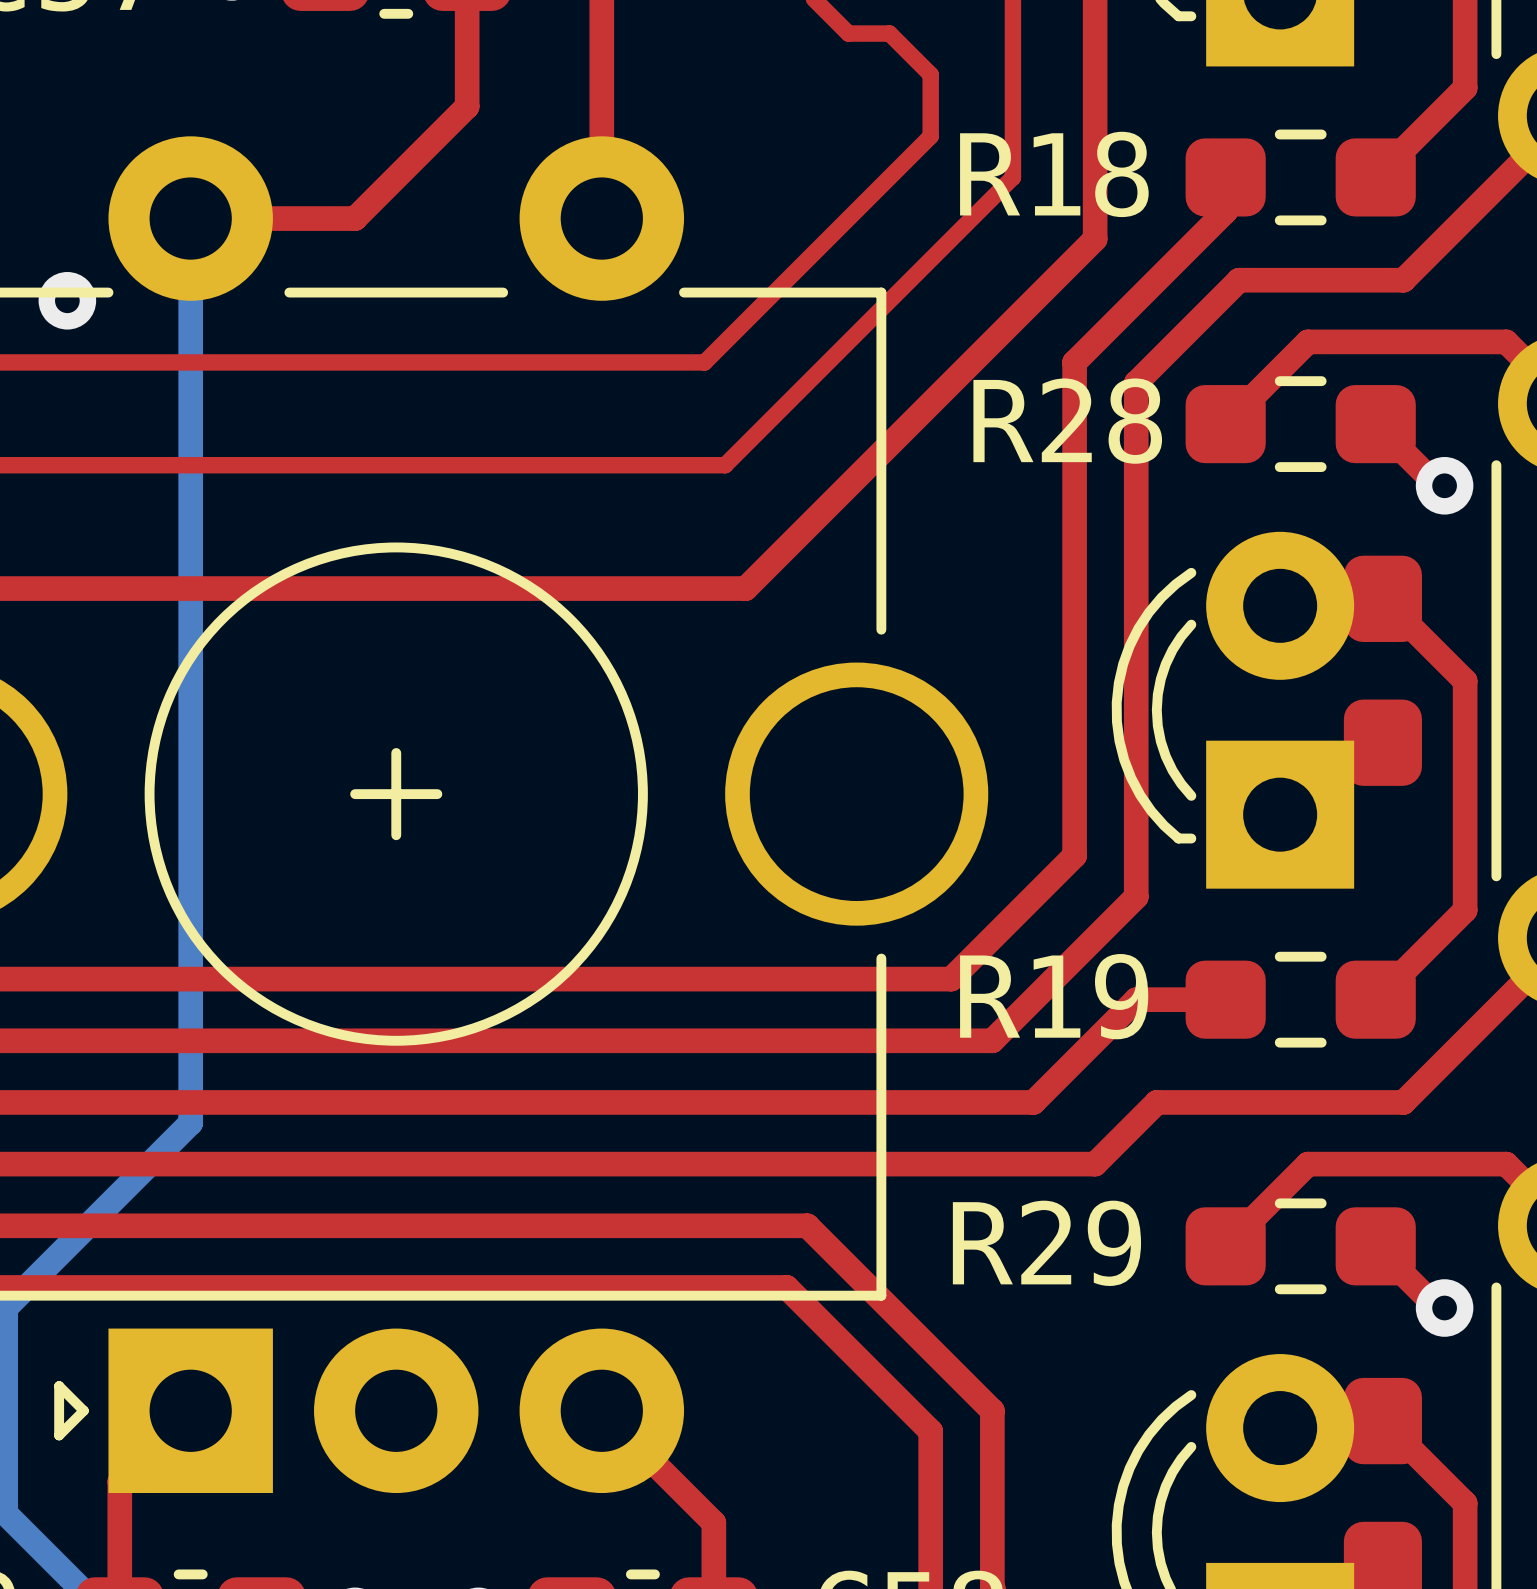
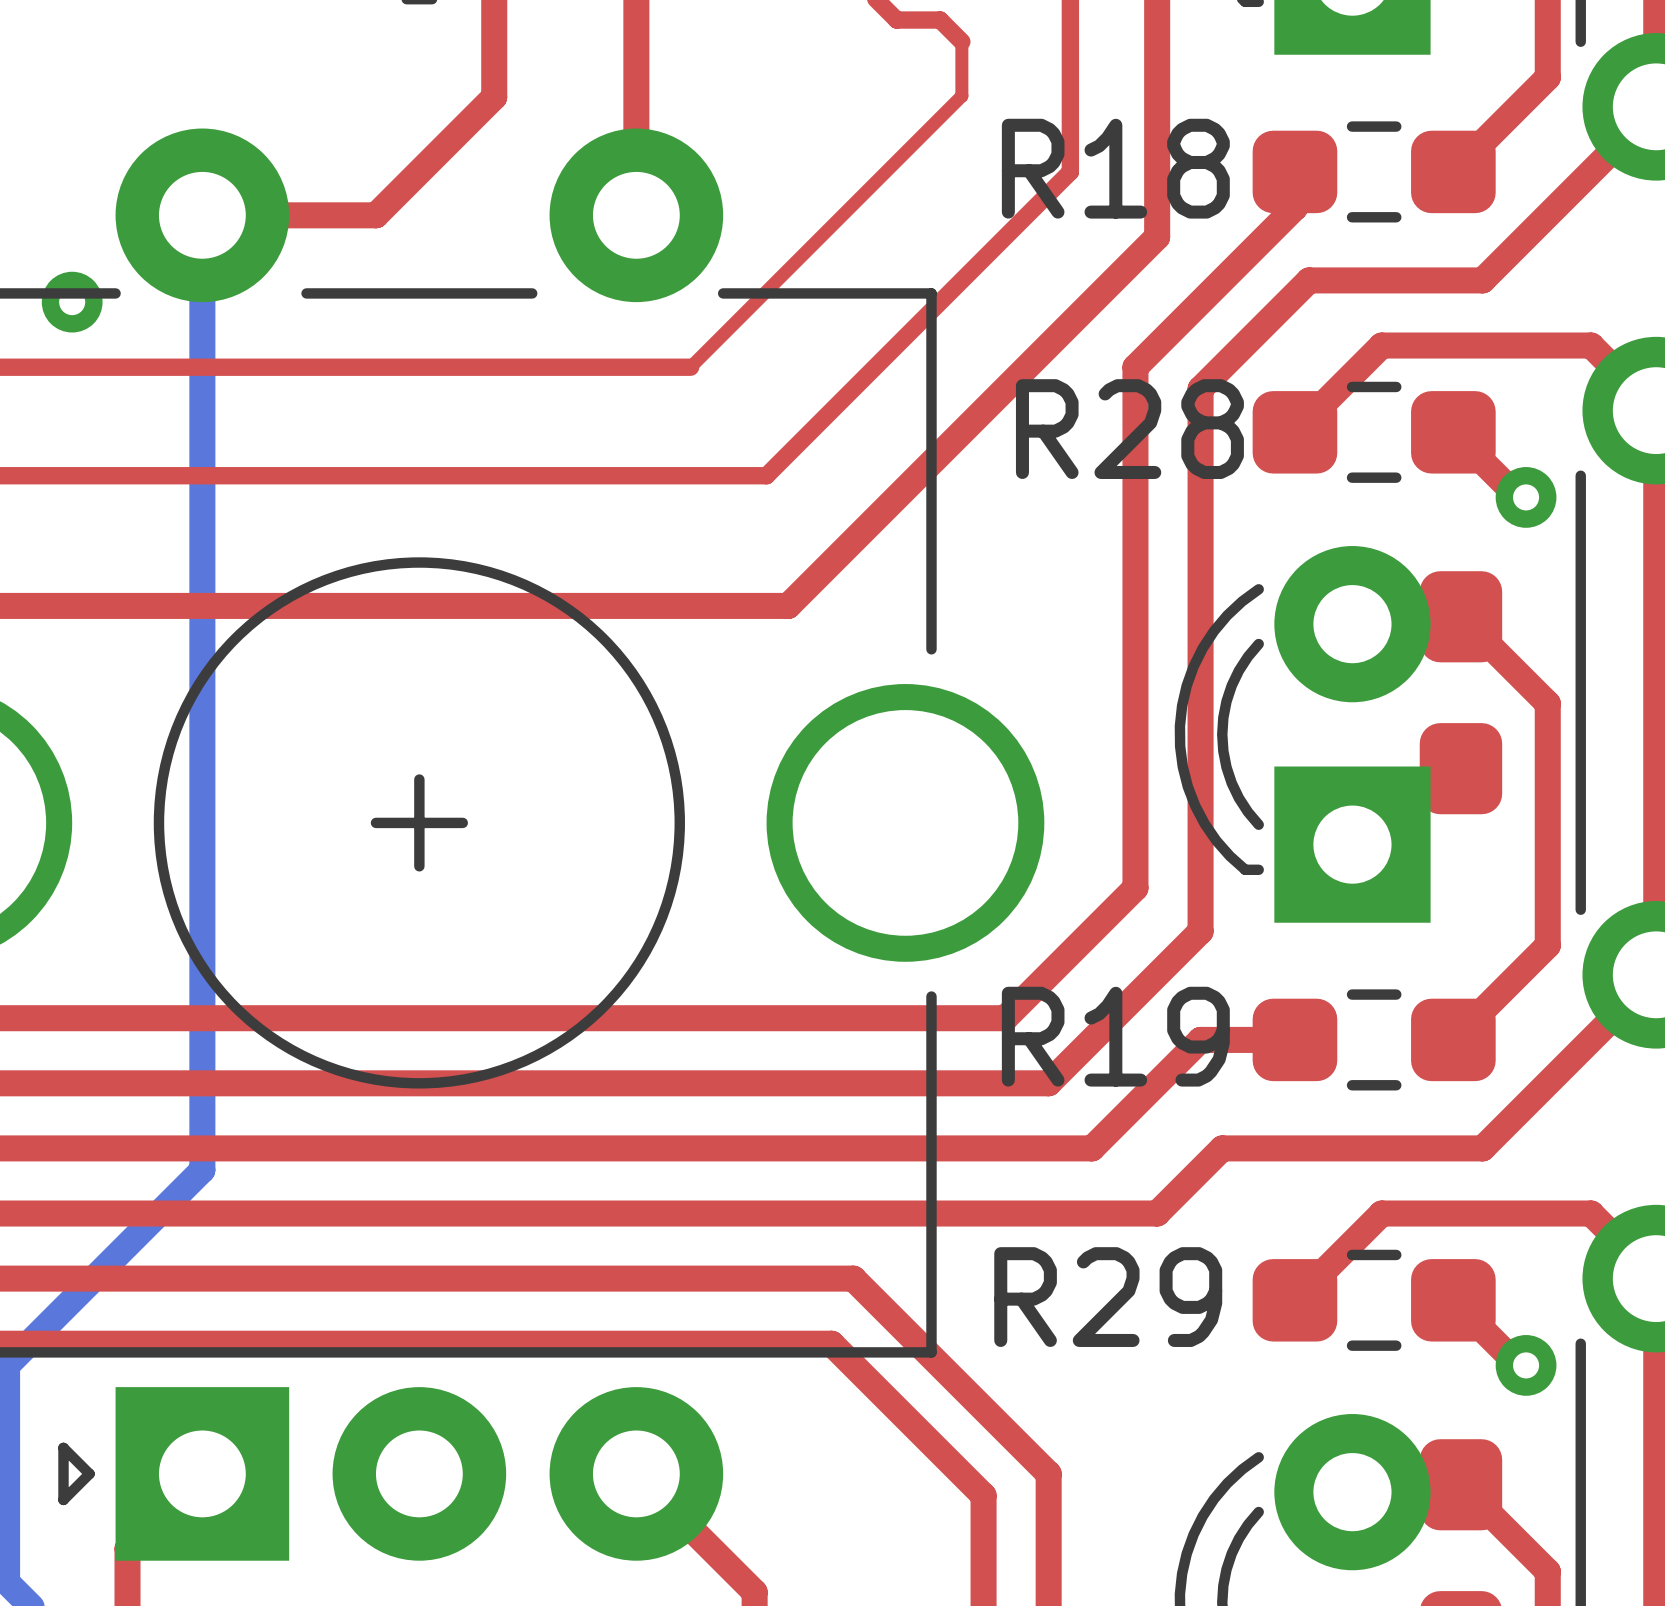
top track: (910, 54) (930, 74) (930, 136) (704, 362) (653, 362) -> (961, 41) (961, 95) (690, 367)

